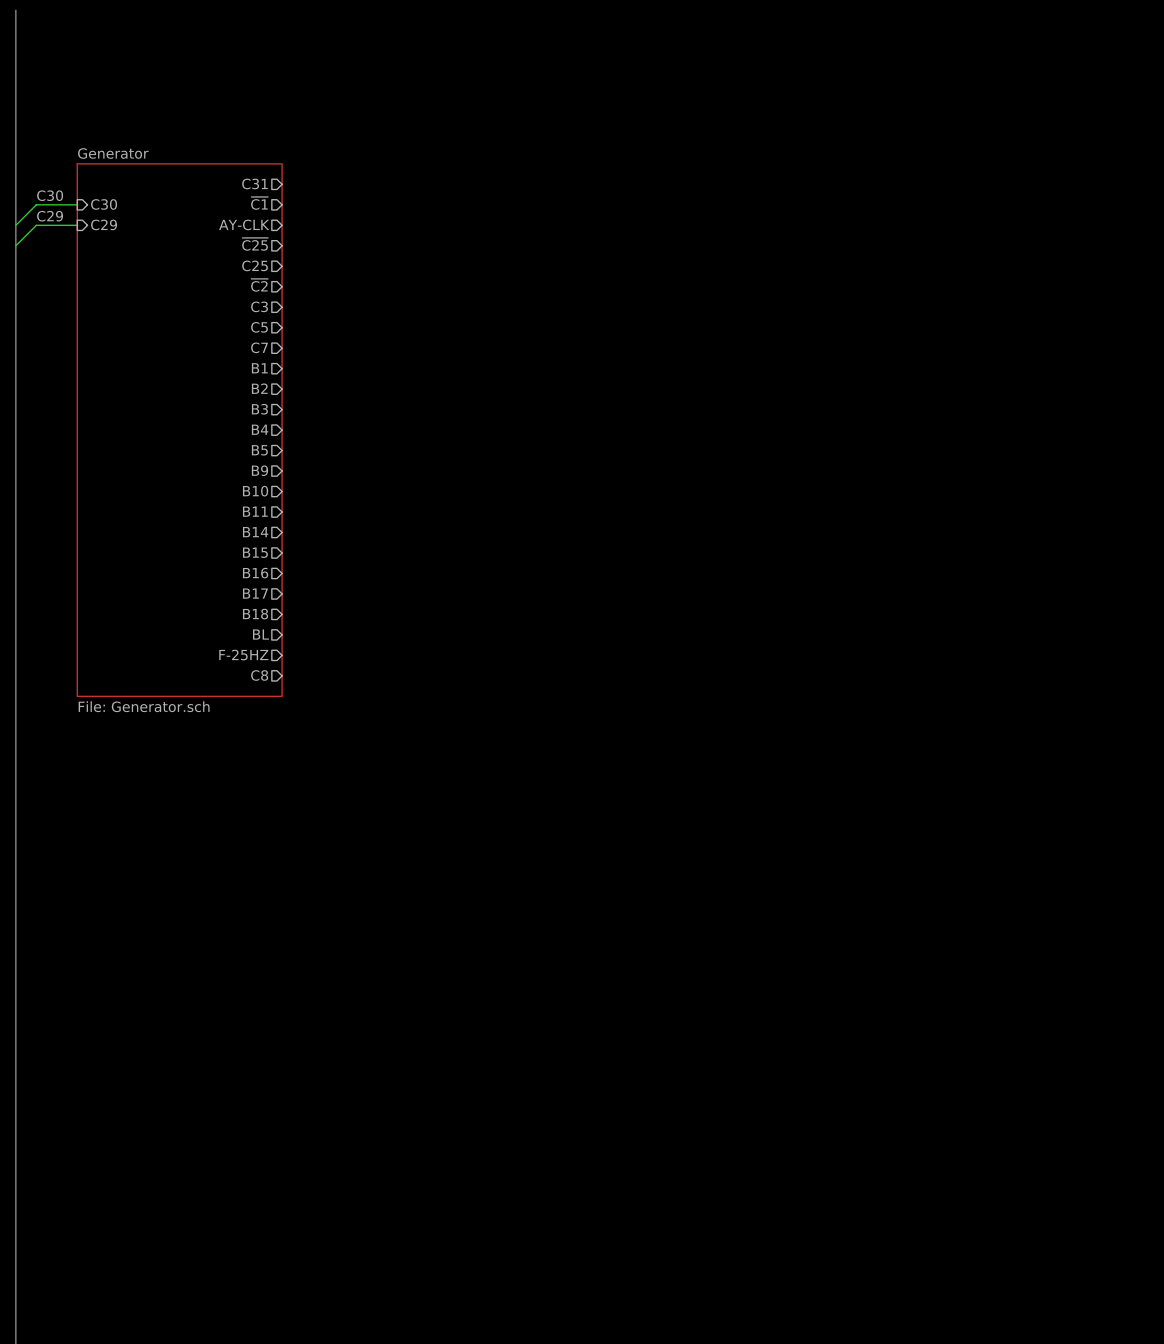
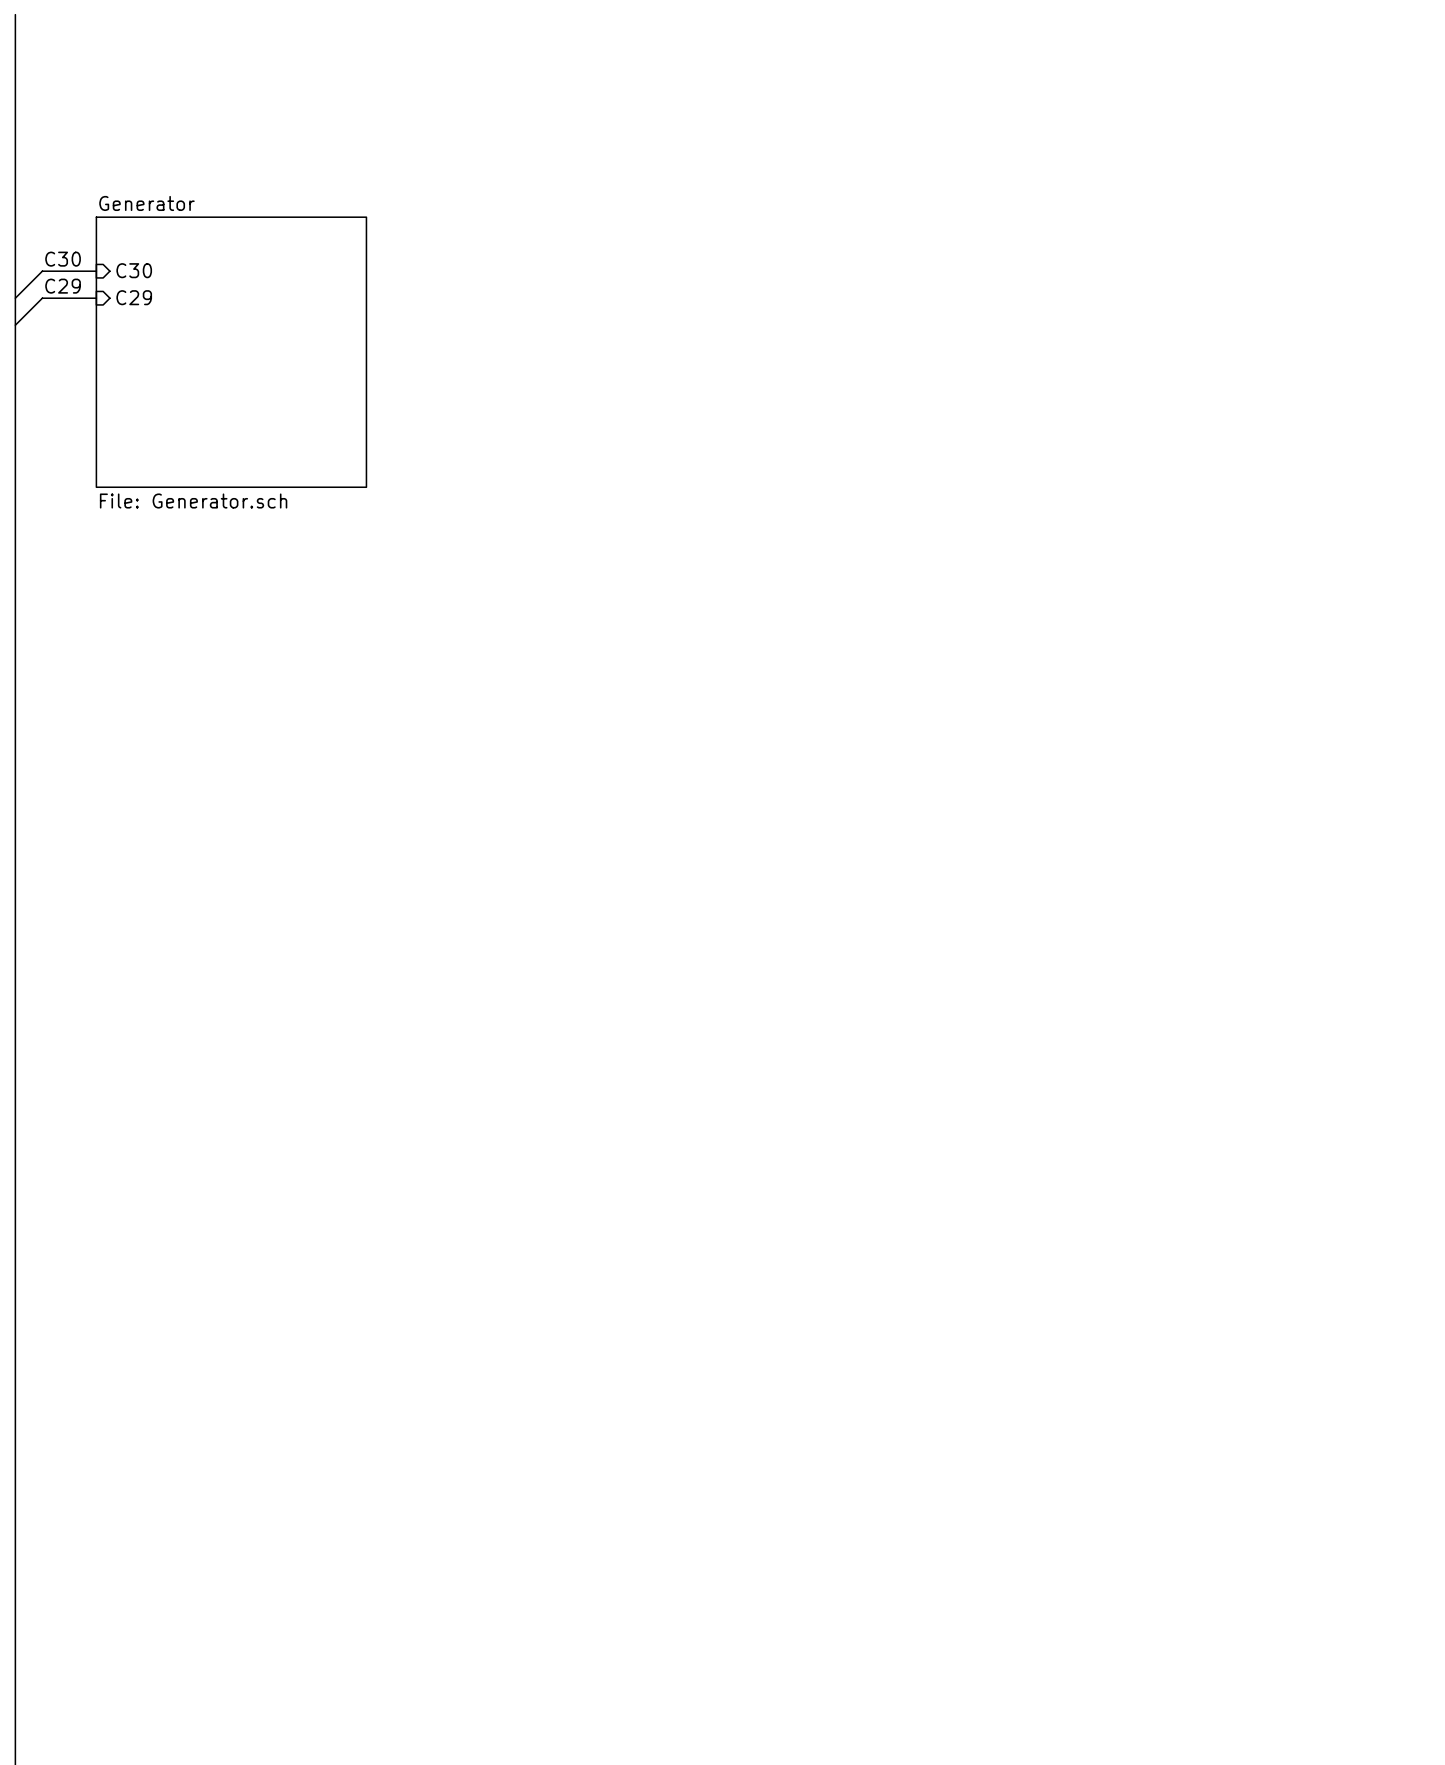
sheet pin: C31 (254, 183) -> none
sheet pin: ~{C1} (259, 203) -> none
sheet pin: AY-CLK (244, 224) -> none
sheet pin: ~{C25} (255, 244) -> none
sheet pin: C25 (255, 265) -> none
sheet Generator: none -> File: Generator.sch (231, 352)
sheet pin: ~{C2} (259, 285) -> none
sheet pin: C3 (259, 306) -> none
sheet pin: C5 (259, 327) -> none
sheet pin: C7 (259, 347) -> none
sheet pin: B1 (259, 368) -> none
sheet pin: B2 (259, 388) -> none
sheet pin: B3 (259, 409) -> none
sheet pin: B4 (260, 429) -> none
sheet Generator: File: Generator.sch (179, 430) -> none
sheet pin: B5 (259, 450) -> none
sheet pin: B9 (259, 470) -> none
sheet pin: B10 (255, 491) -> none
sheet pin: B11 (255, 511) -> none
sheet pin: B14 (255, 532) -> none
sheet pin: B15 (255, 552) -> none
sheet pin: B16 (255, 573) -> none
sheet pin: B17 (255, 593) -> none
sheet pin: B18 (255, 614) -> none
sheet pin: BL (261, 634) -> none
sheet pin: F-25HZ (243, 655) -> none
sheet pin: C8 (259, 675) -> none

